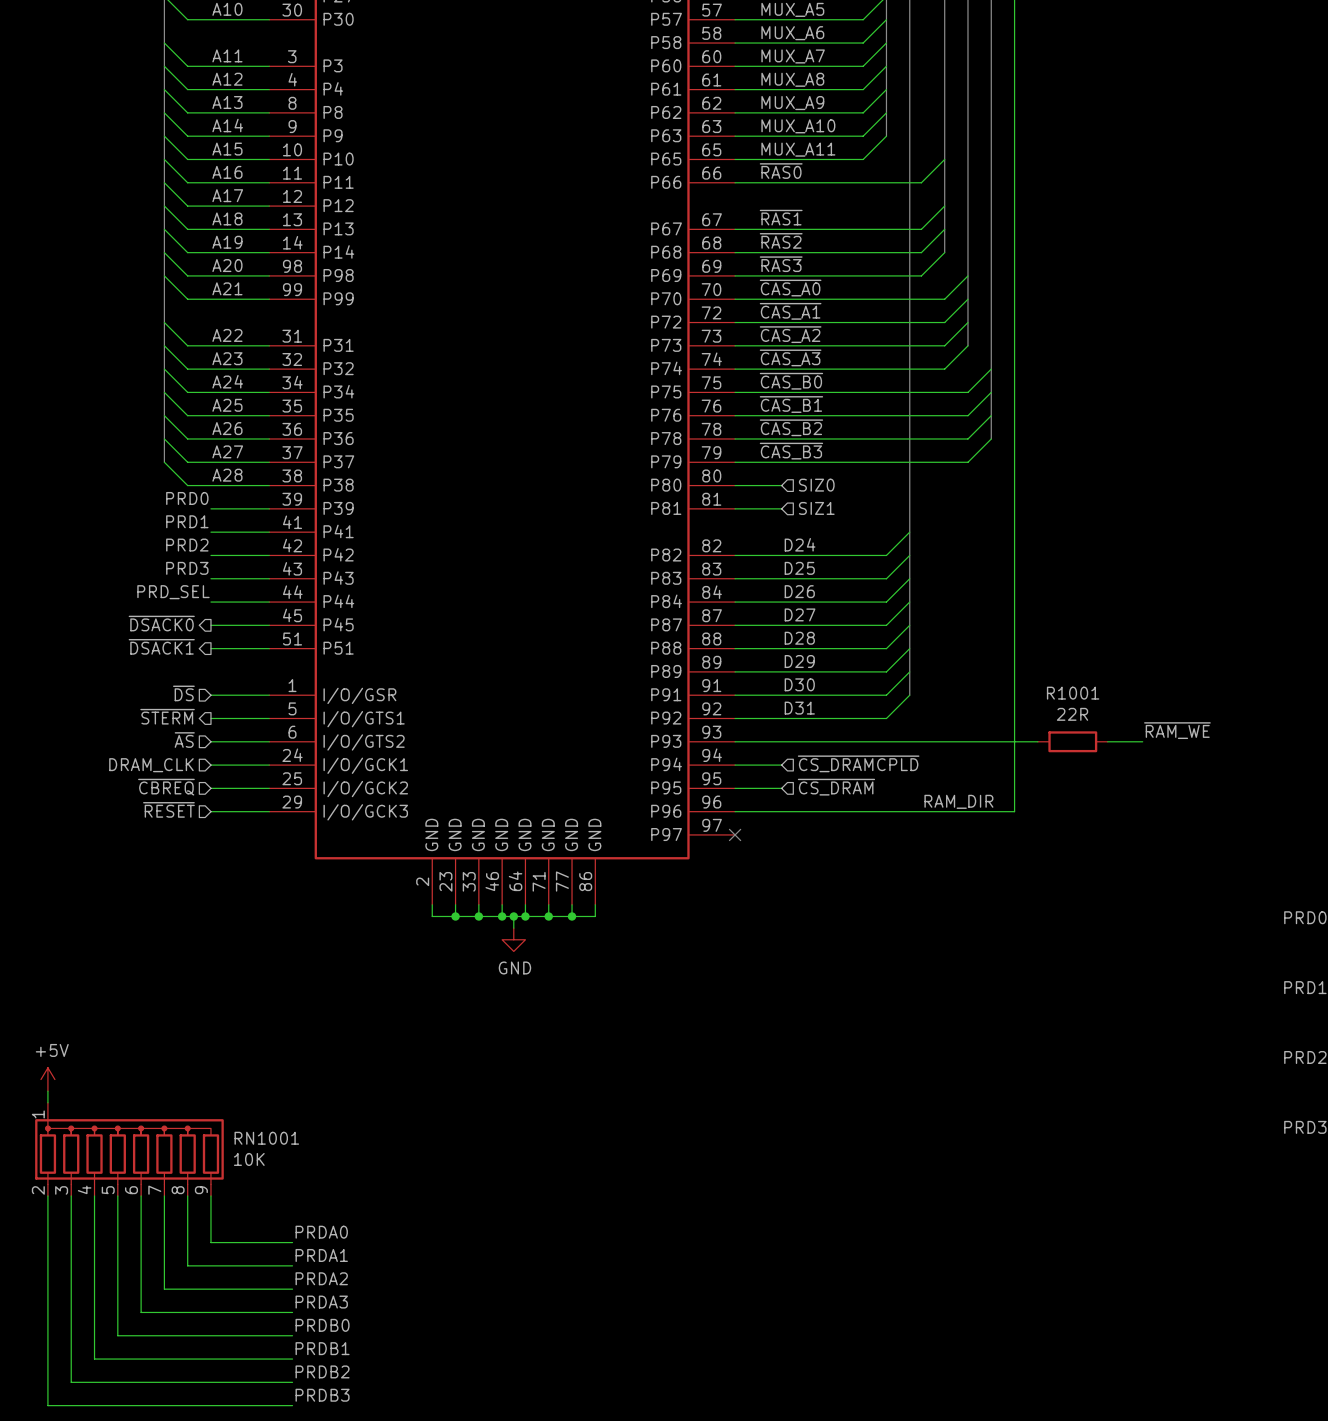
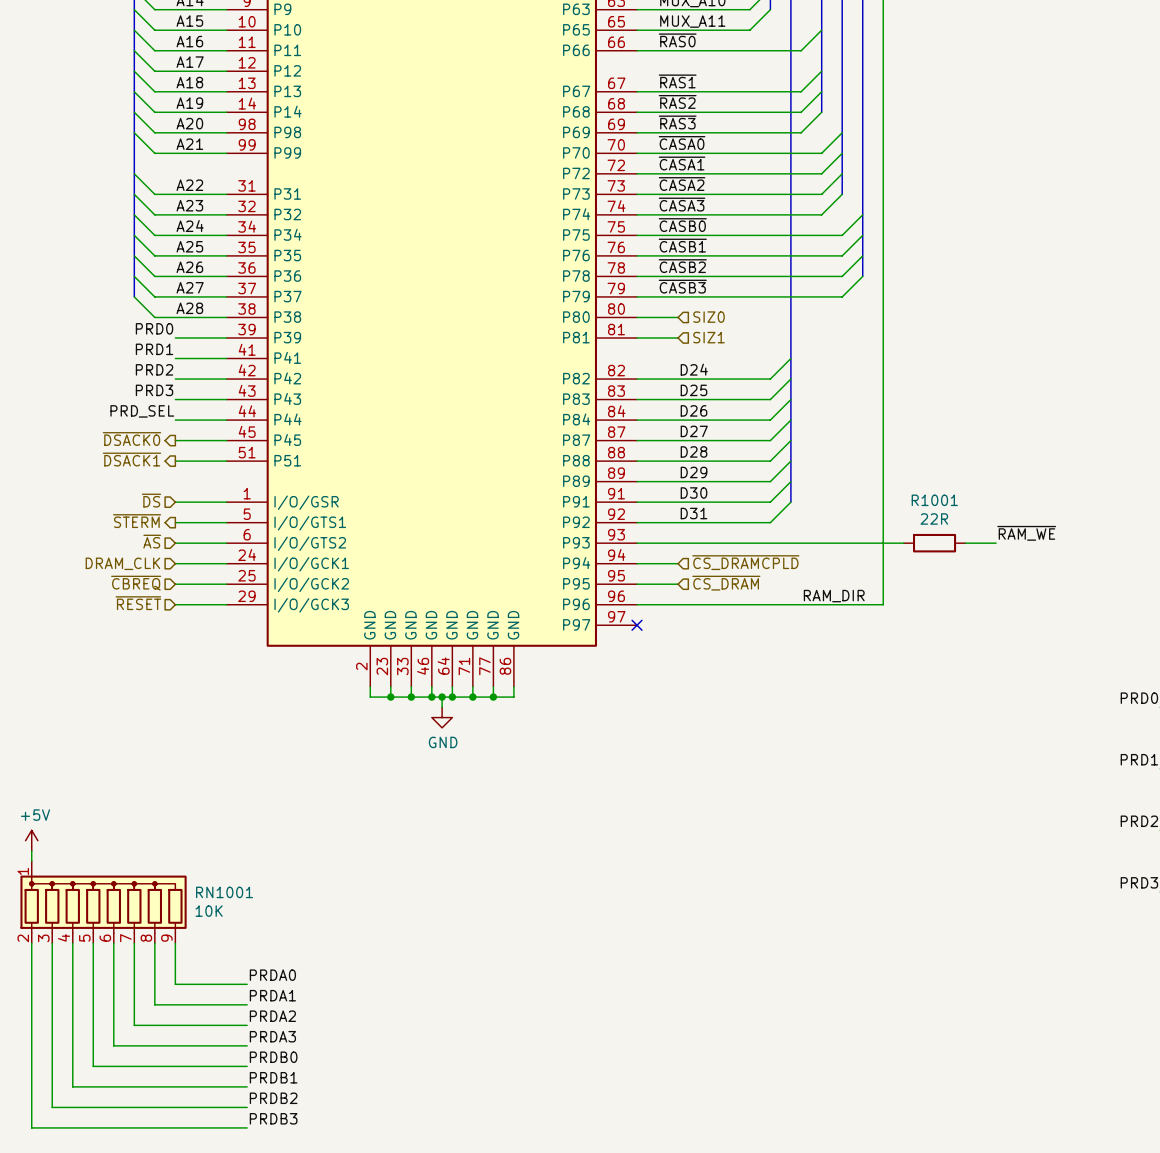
label: ~{CAS_A0} (790, 288) -> ~{CASA0} (682, 142)
label: ~{CAS_A1} (790, 311) -> ~{CASA1} (682, 163)
label: ~{CAS_A2} (790, 334) -> ~{CASA2} (682, 184)
label: ~{CAS_A3} (790, 357) -> ~{CASA3} (682, 204)
label: ~{CAS_B0} (791, 381) -> ~{CASB0} (682, 225)
label: ~{CAS_B1} (791, 404) -> ~{CASB1} (682, 245)
label: ~{CAS_B2} (791, 427) -> ~{CASB2} (682, 266)
label: ~{CAS_B3} (791, 451) -> ~{CASB3} (682, 286)

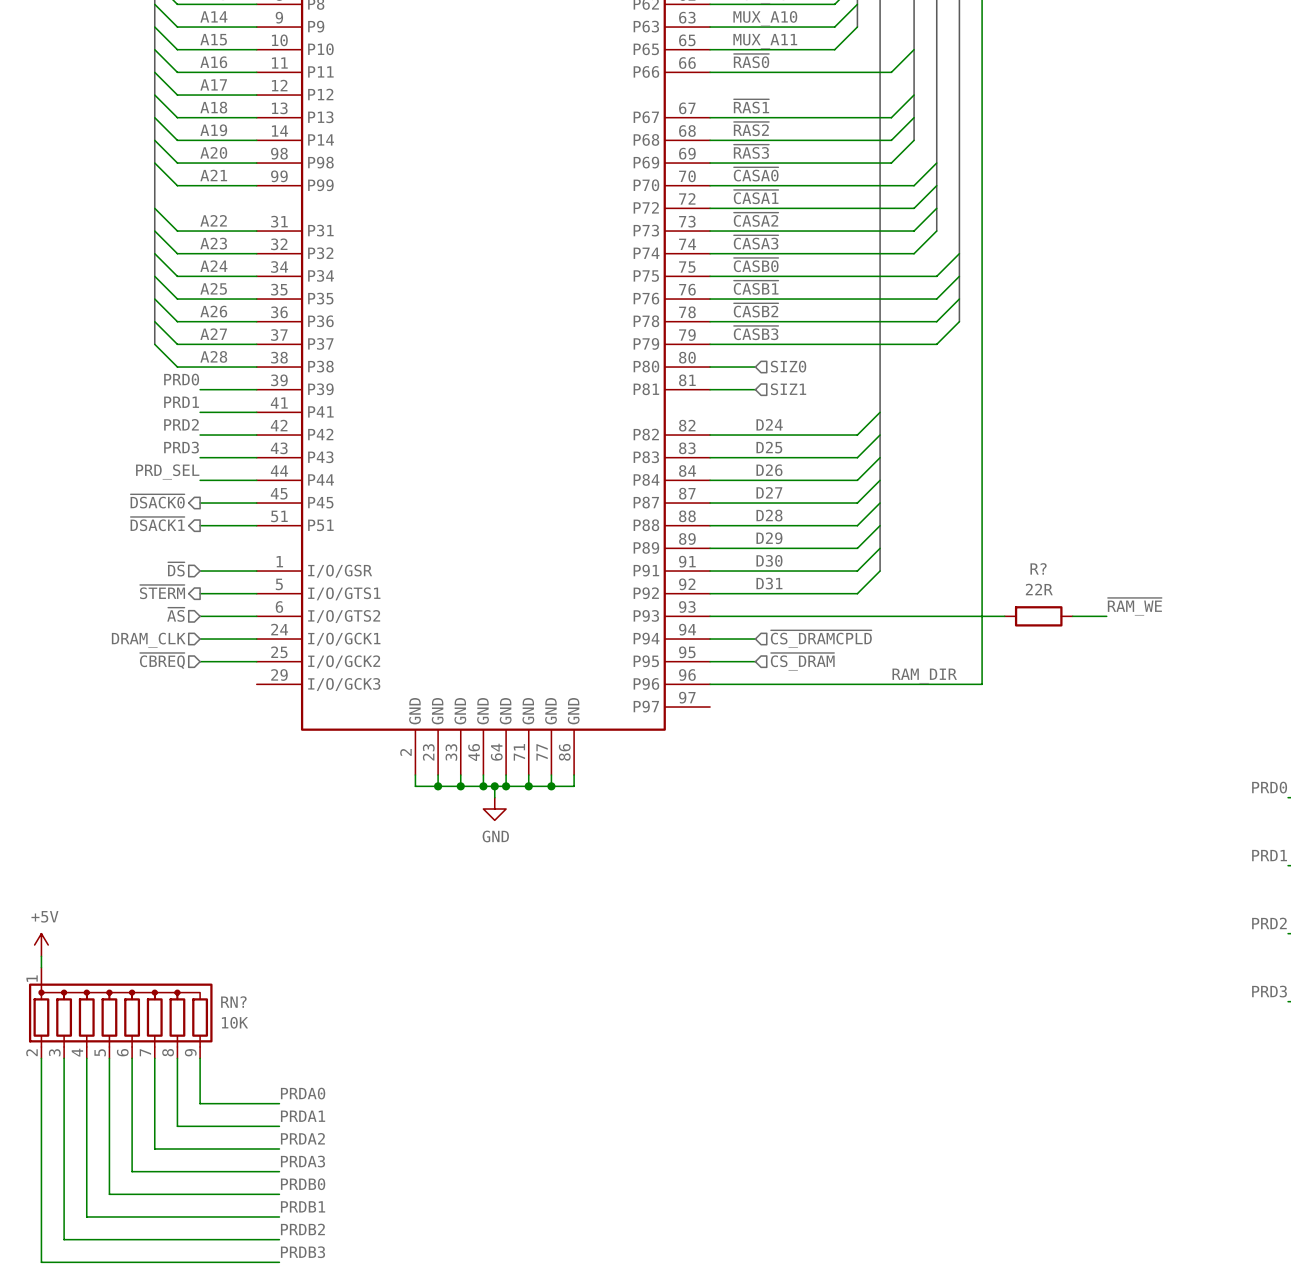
R1001 name: R1001 (934, 500) -> R? (1038, 568)
hierarchical label: ~{RESET} (138, 603) -> none
wire: (175, 604) (226, 604) -> none
no-connect mark: (637, 625) -> none
RN1001 name: RN1001 (224, 892) -> RN? (233, 1002)

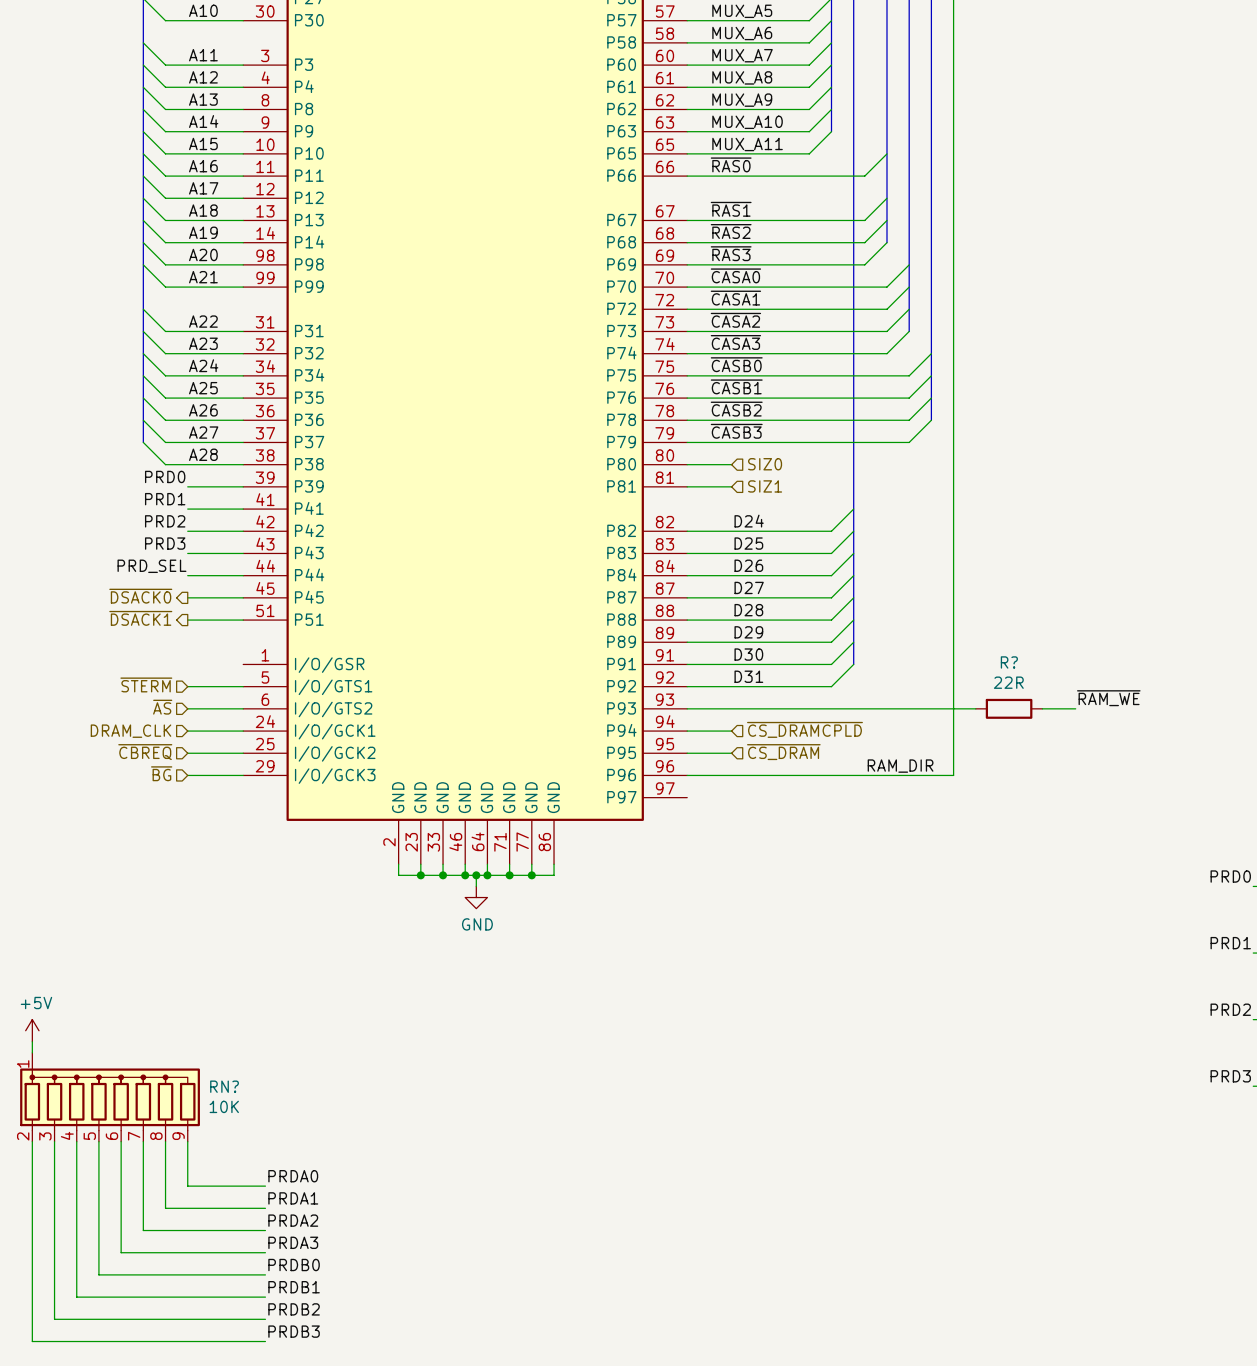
hierarchical label: ~{DS} (176, 569) -> none
wire: (200, 571) (256, 571) -> (187, 775) (243, 775)
hierarchical label shape: output (162, 592) -> input (146, 684)
hierarchical label: none -> ~{BG} (161, 773)

